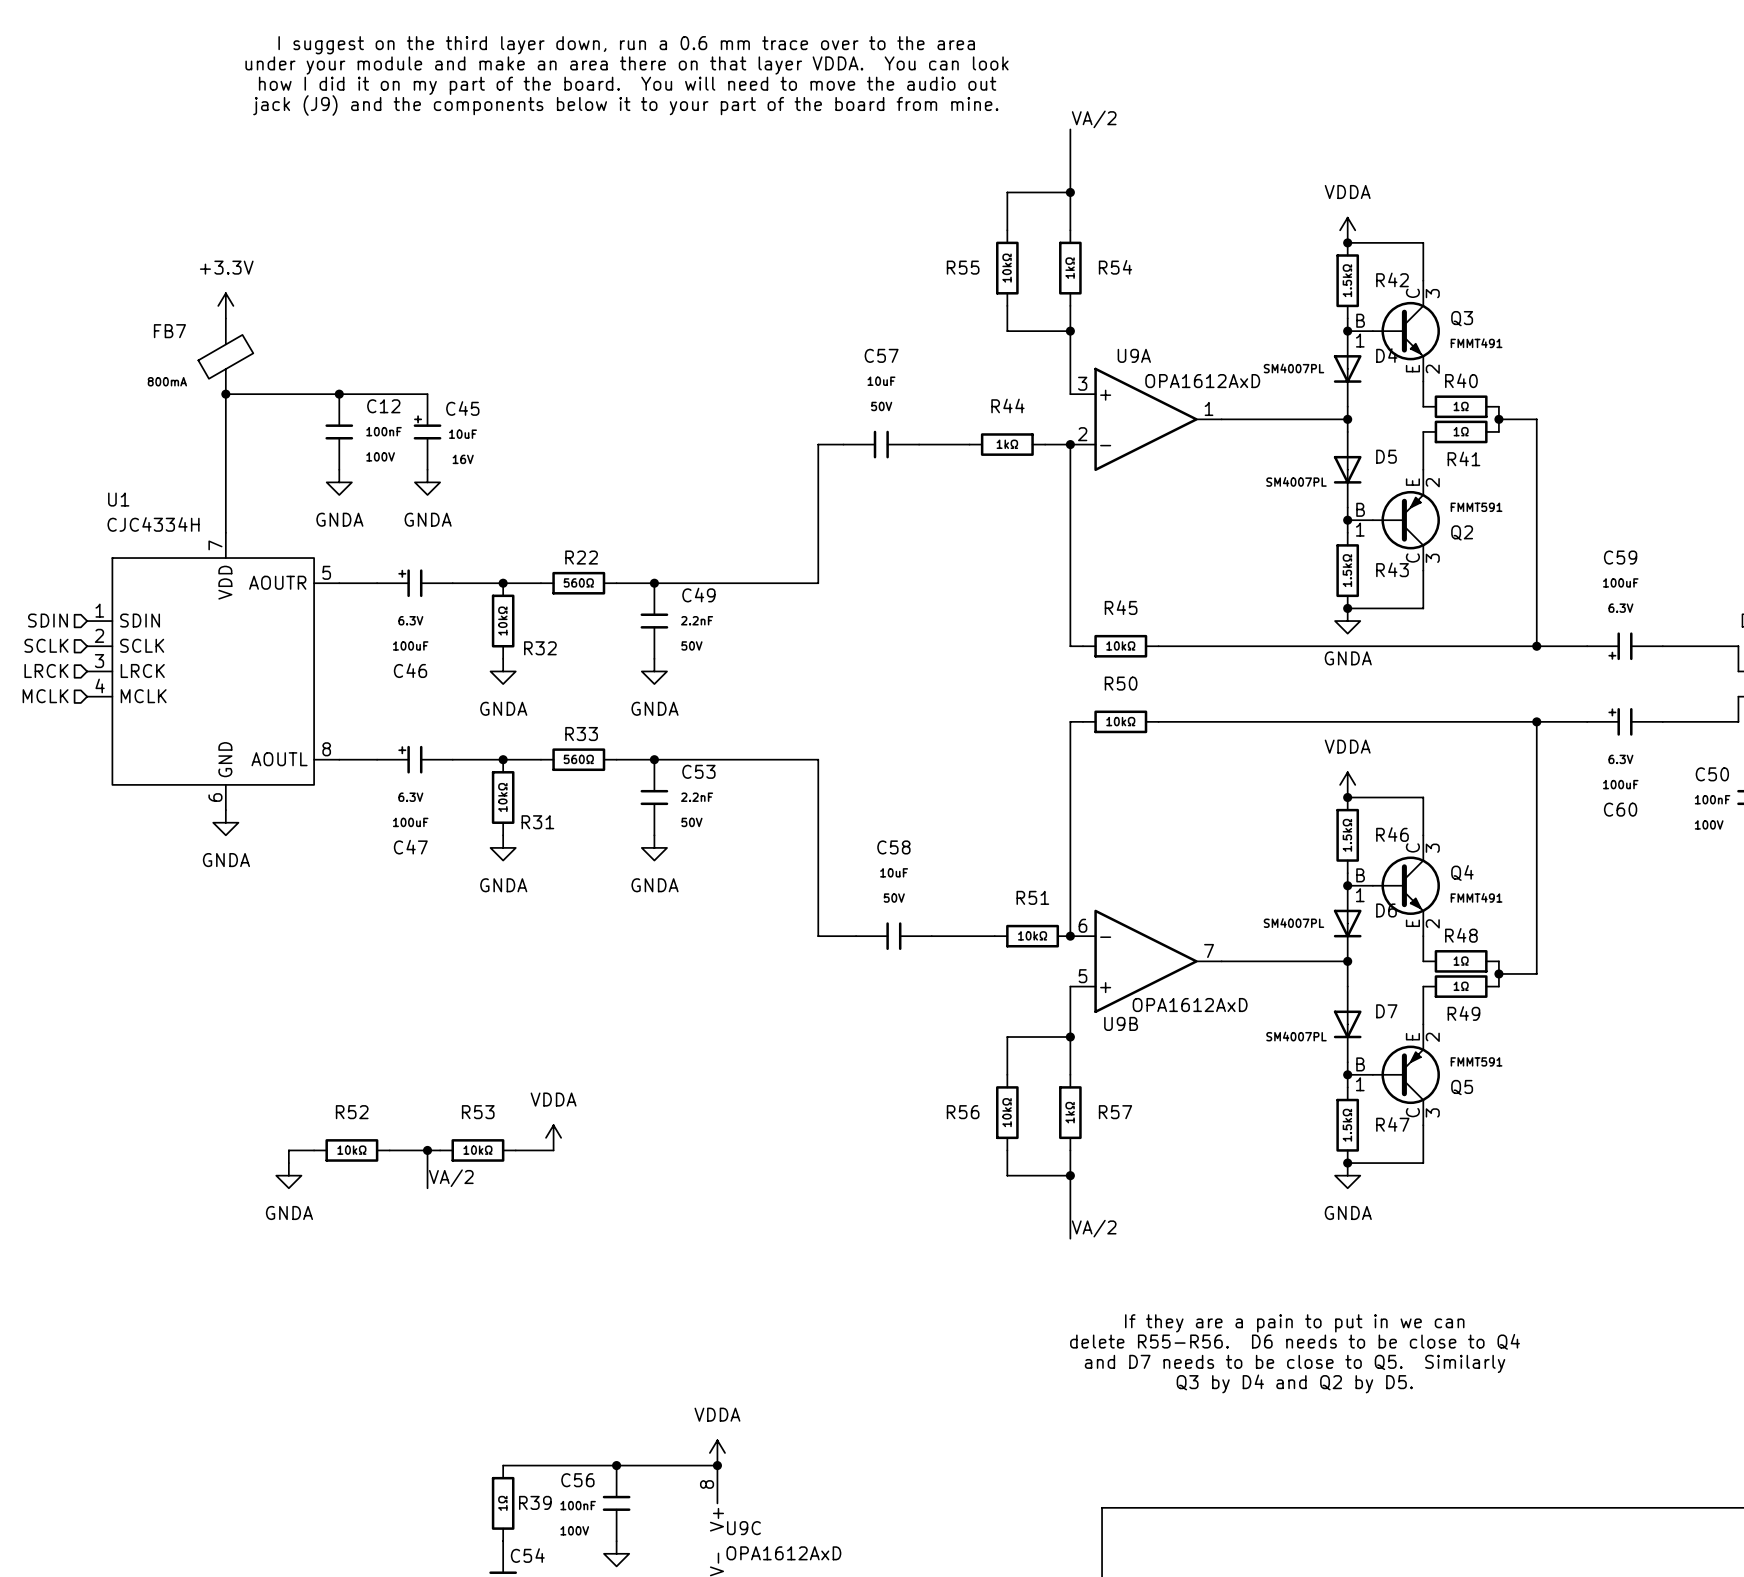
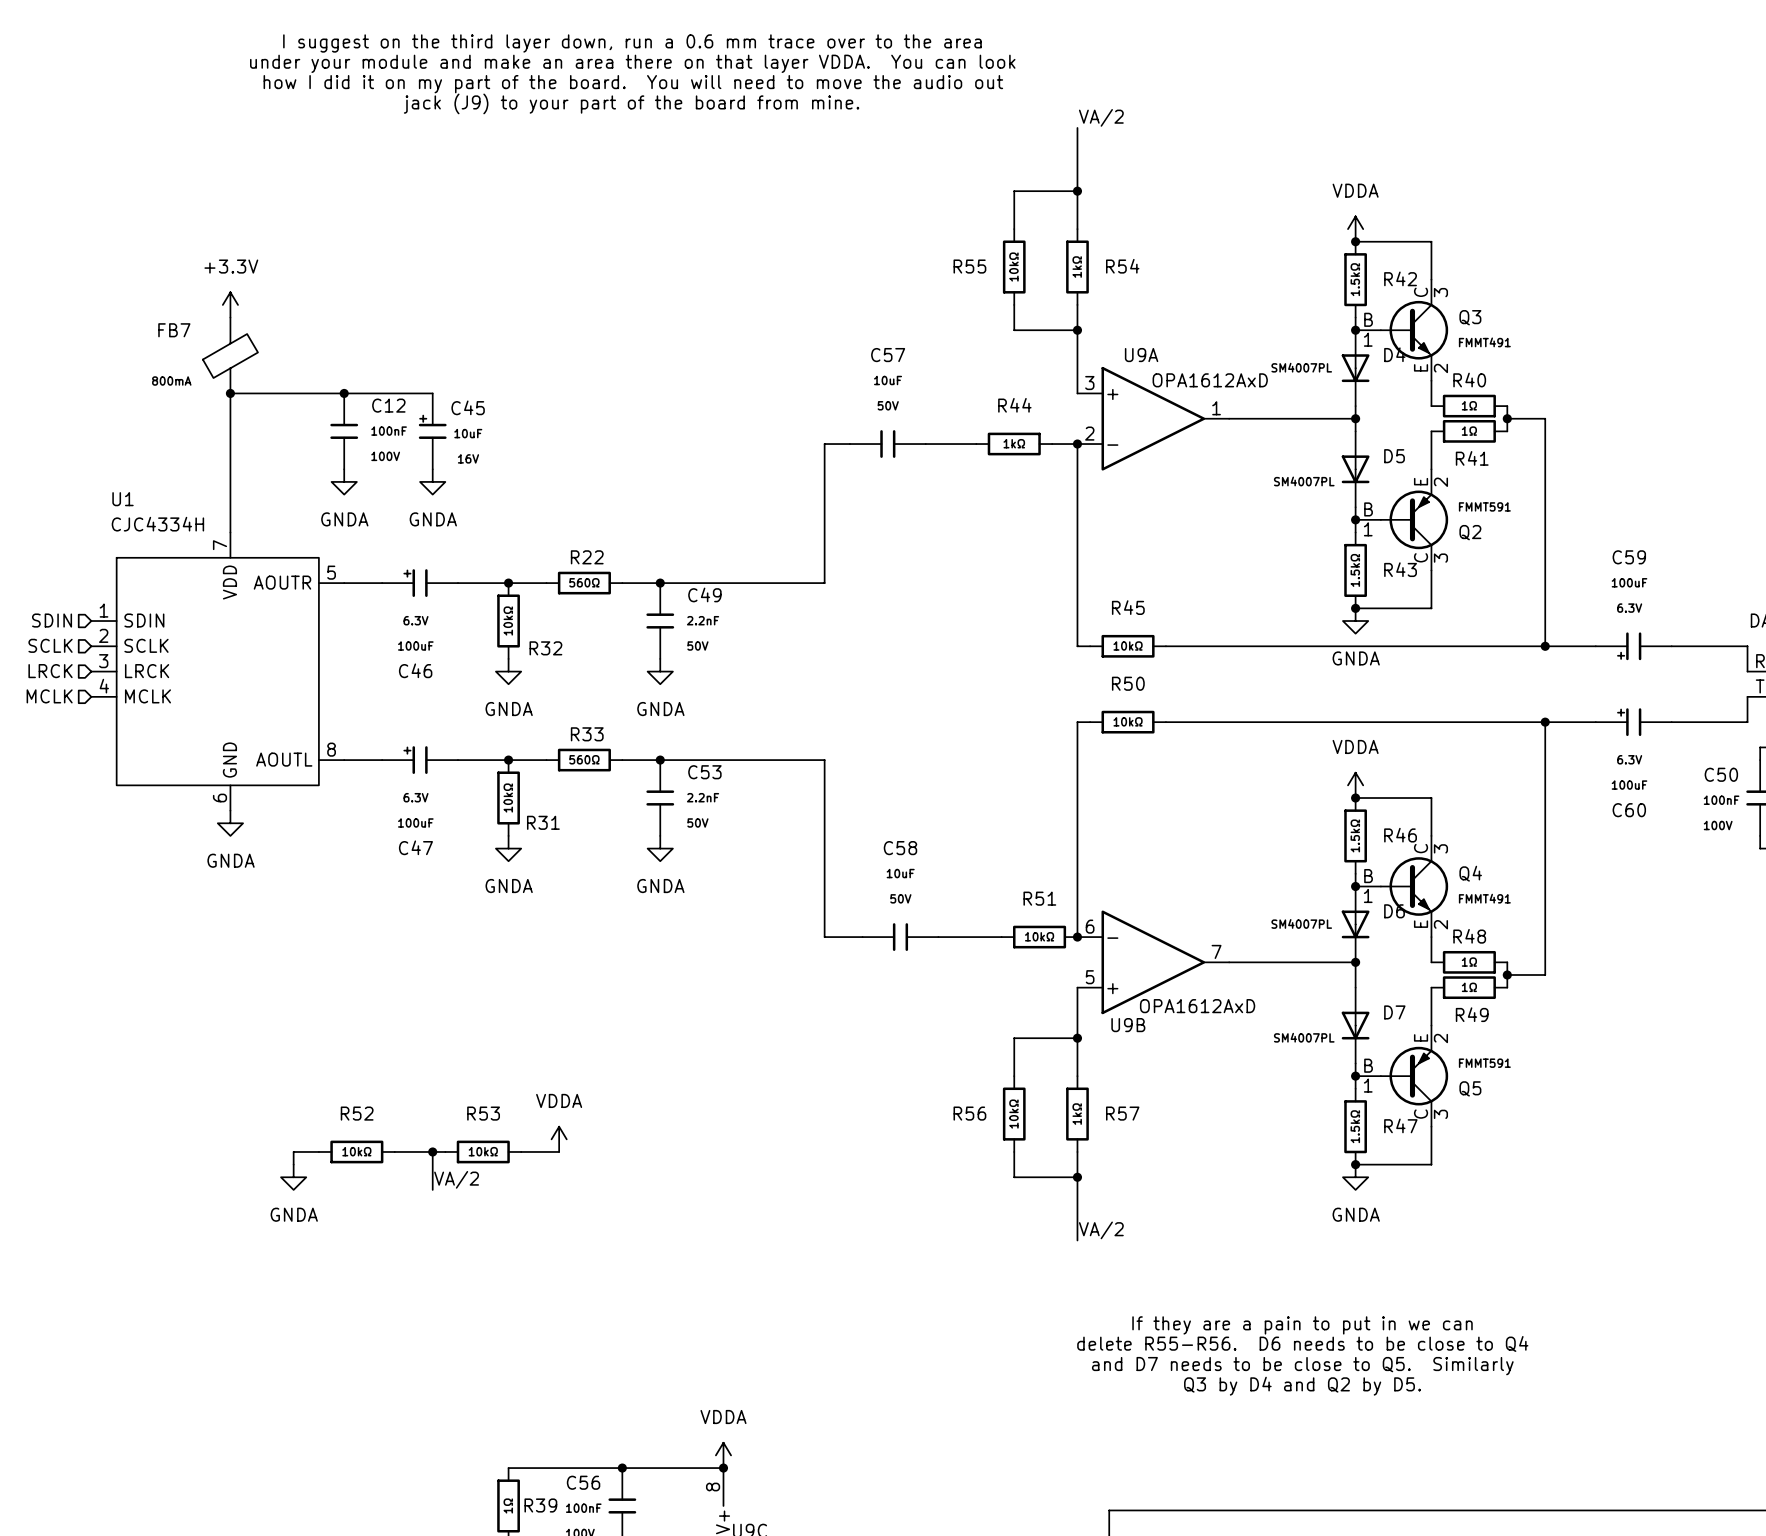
text: jack (J9) and the components below it to your part of the board from mine. (625, 105) -> jack (J9) to your part of the board from mine. (631, 103)

